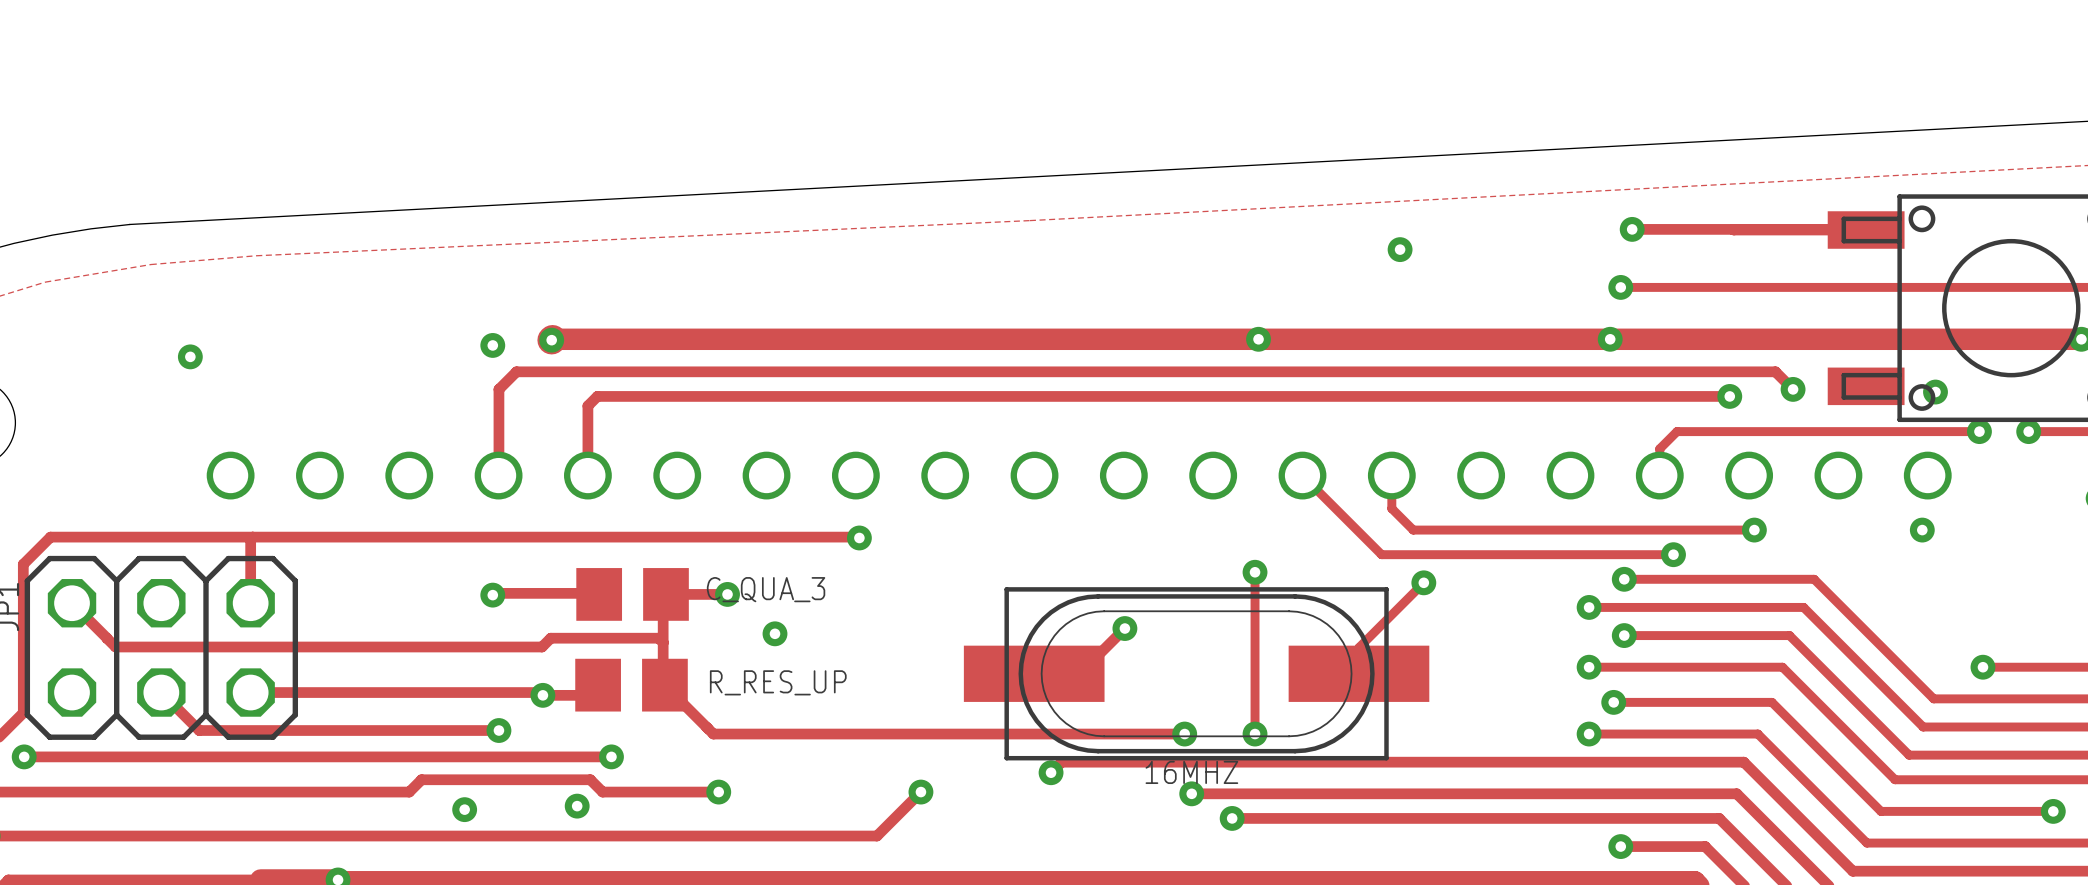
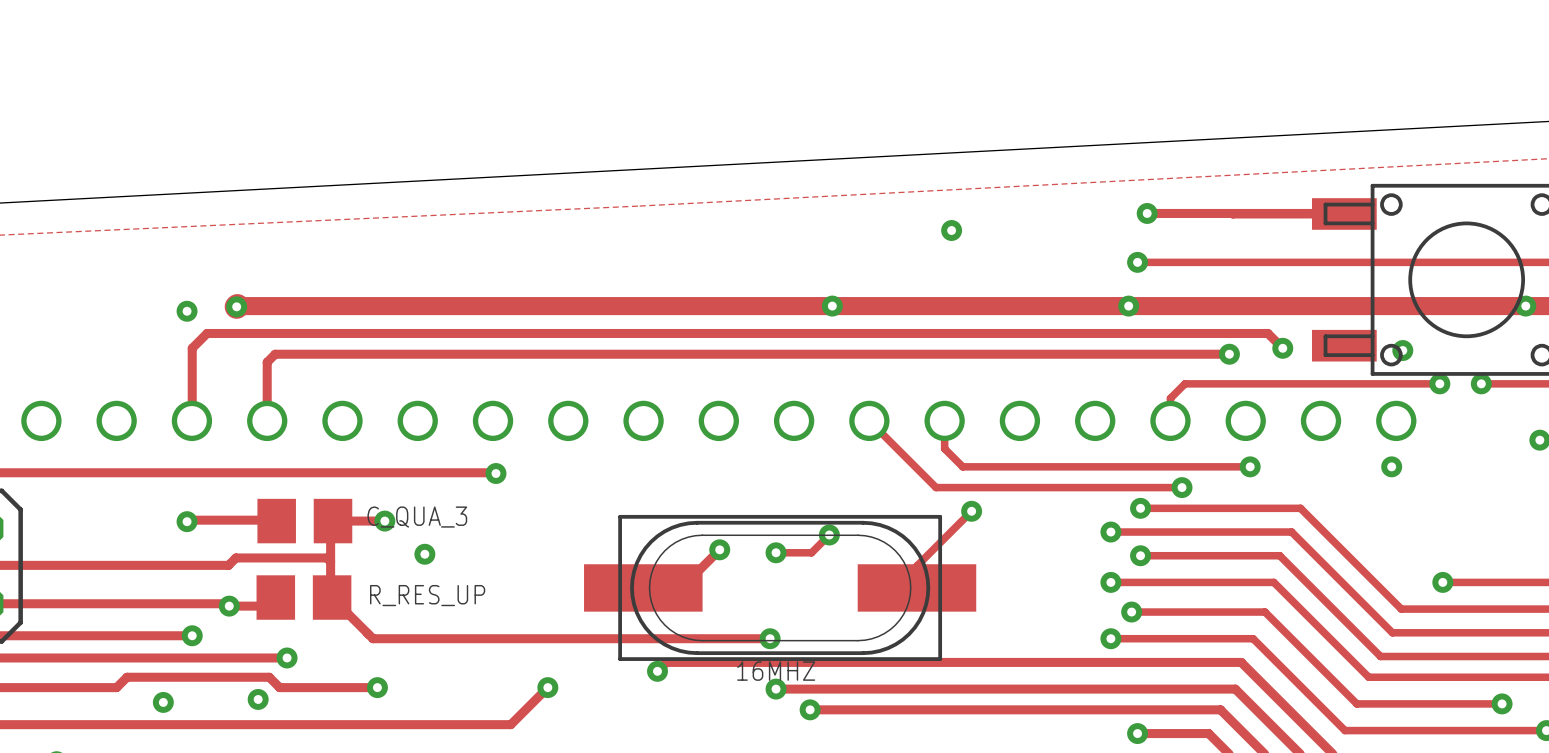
track: (1255, 572) (1255, 734) -> none
via position: (1255, 572) -> (829, 535)
track: none -> (829, 535) (811, 552) (776, 552)
via: none -> (776, 552)
via: (1255, 734) -> none

